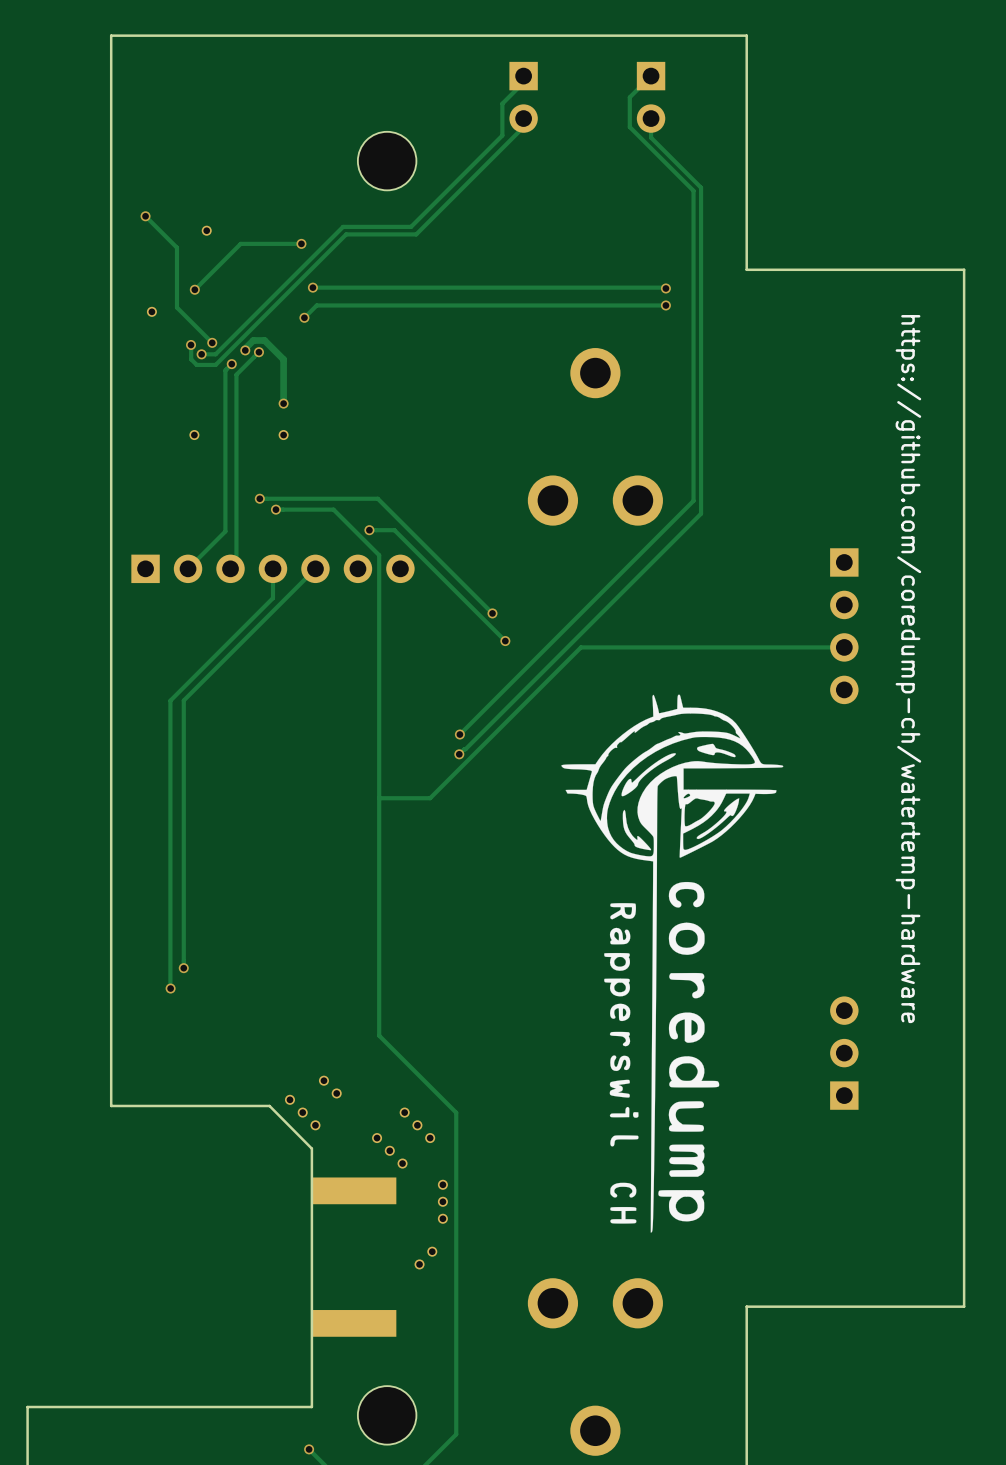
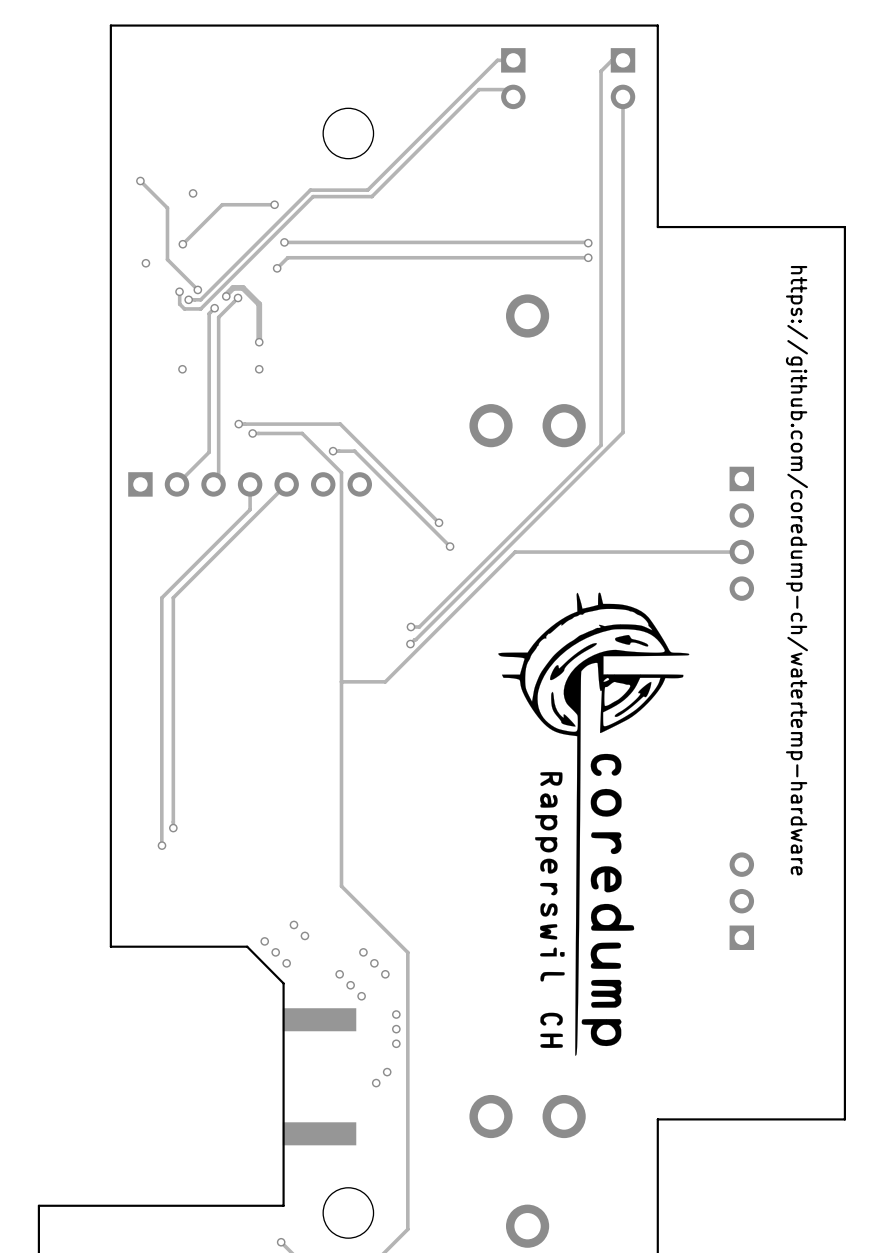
track: (523, 76) (523, 82) (502, 103) (502, 135) (409, 226) -> (513, 60) (497, 60) (367, 190)
track: (651, 76) (629, 97) (629, 127) (693, 190) (693, 500) (459, 734) -> (623, 60) (612, 60) (601, 71) (601, 445) (419, 627) (410, 627)
part: (523, 97) -> none
part: none -> (513, 78)
part: (651, 97) -> none
part: none -> (623, 78)
track: (523, 118) (523, 127) (414, 234) -> (513, 96) (506, 89) (478, 89) (371, 196)
track: (651, 118) (651, 137) (701, 187) (701, 513) -> (623, 96) (623, 432) (618, 437)

